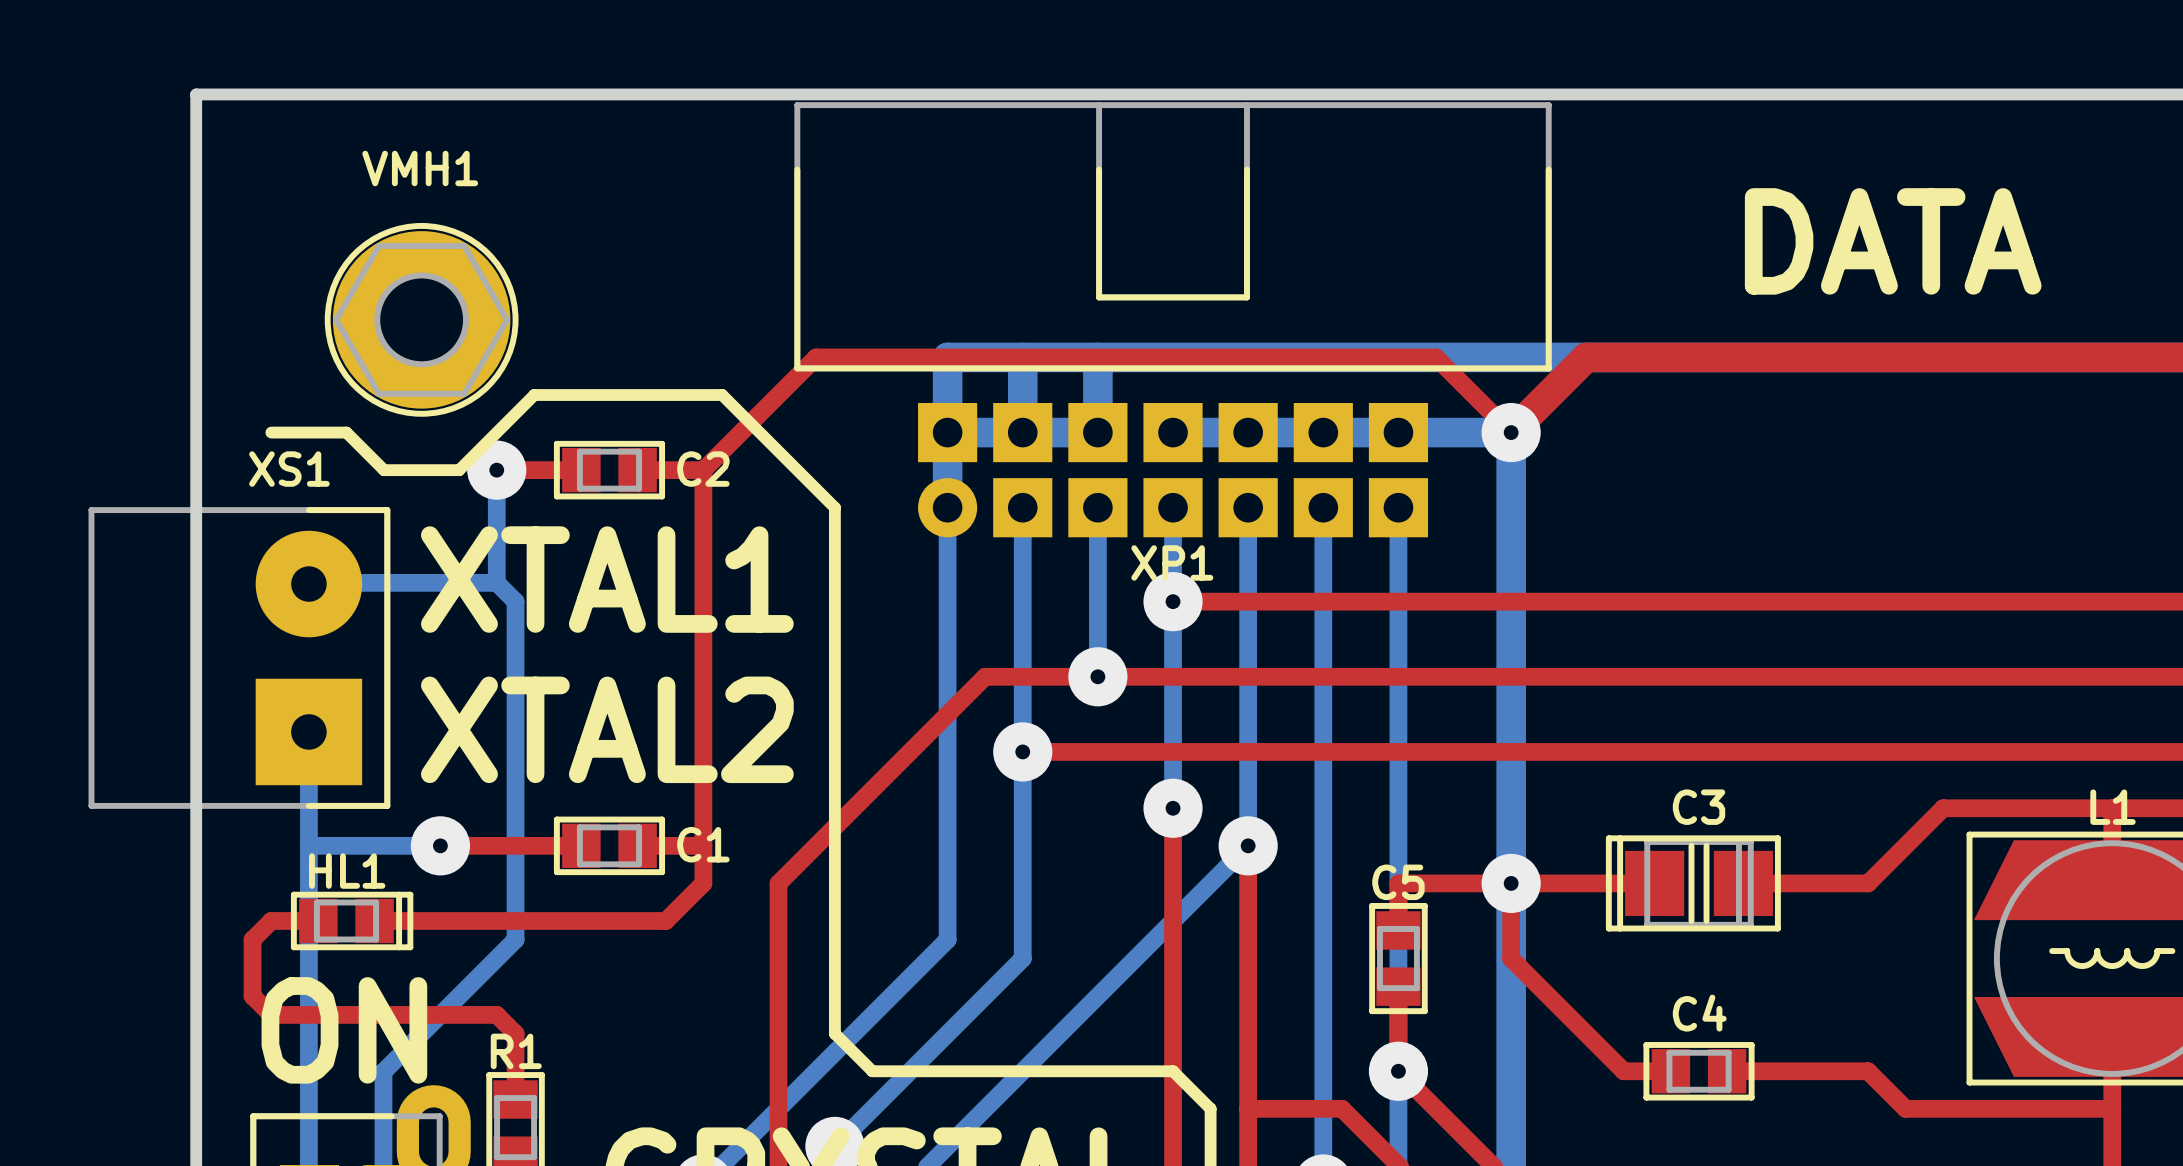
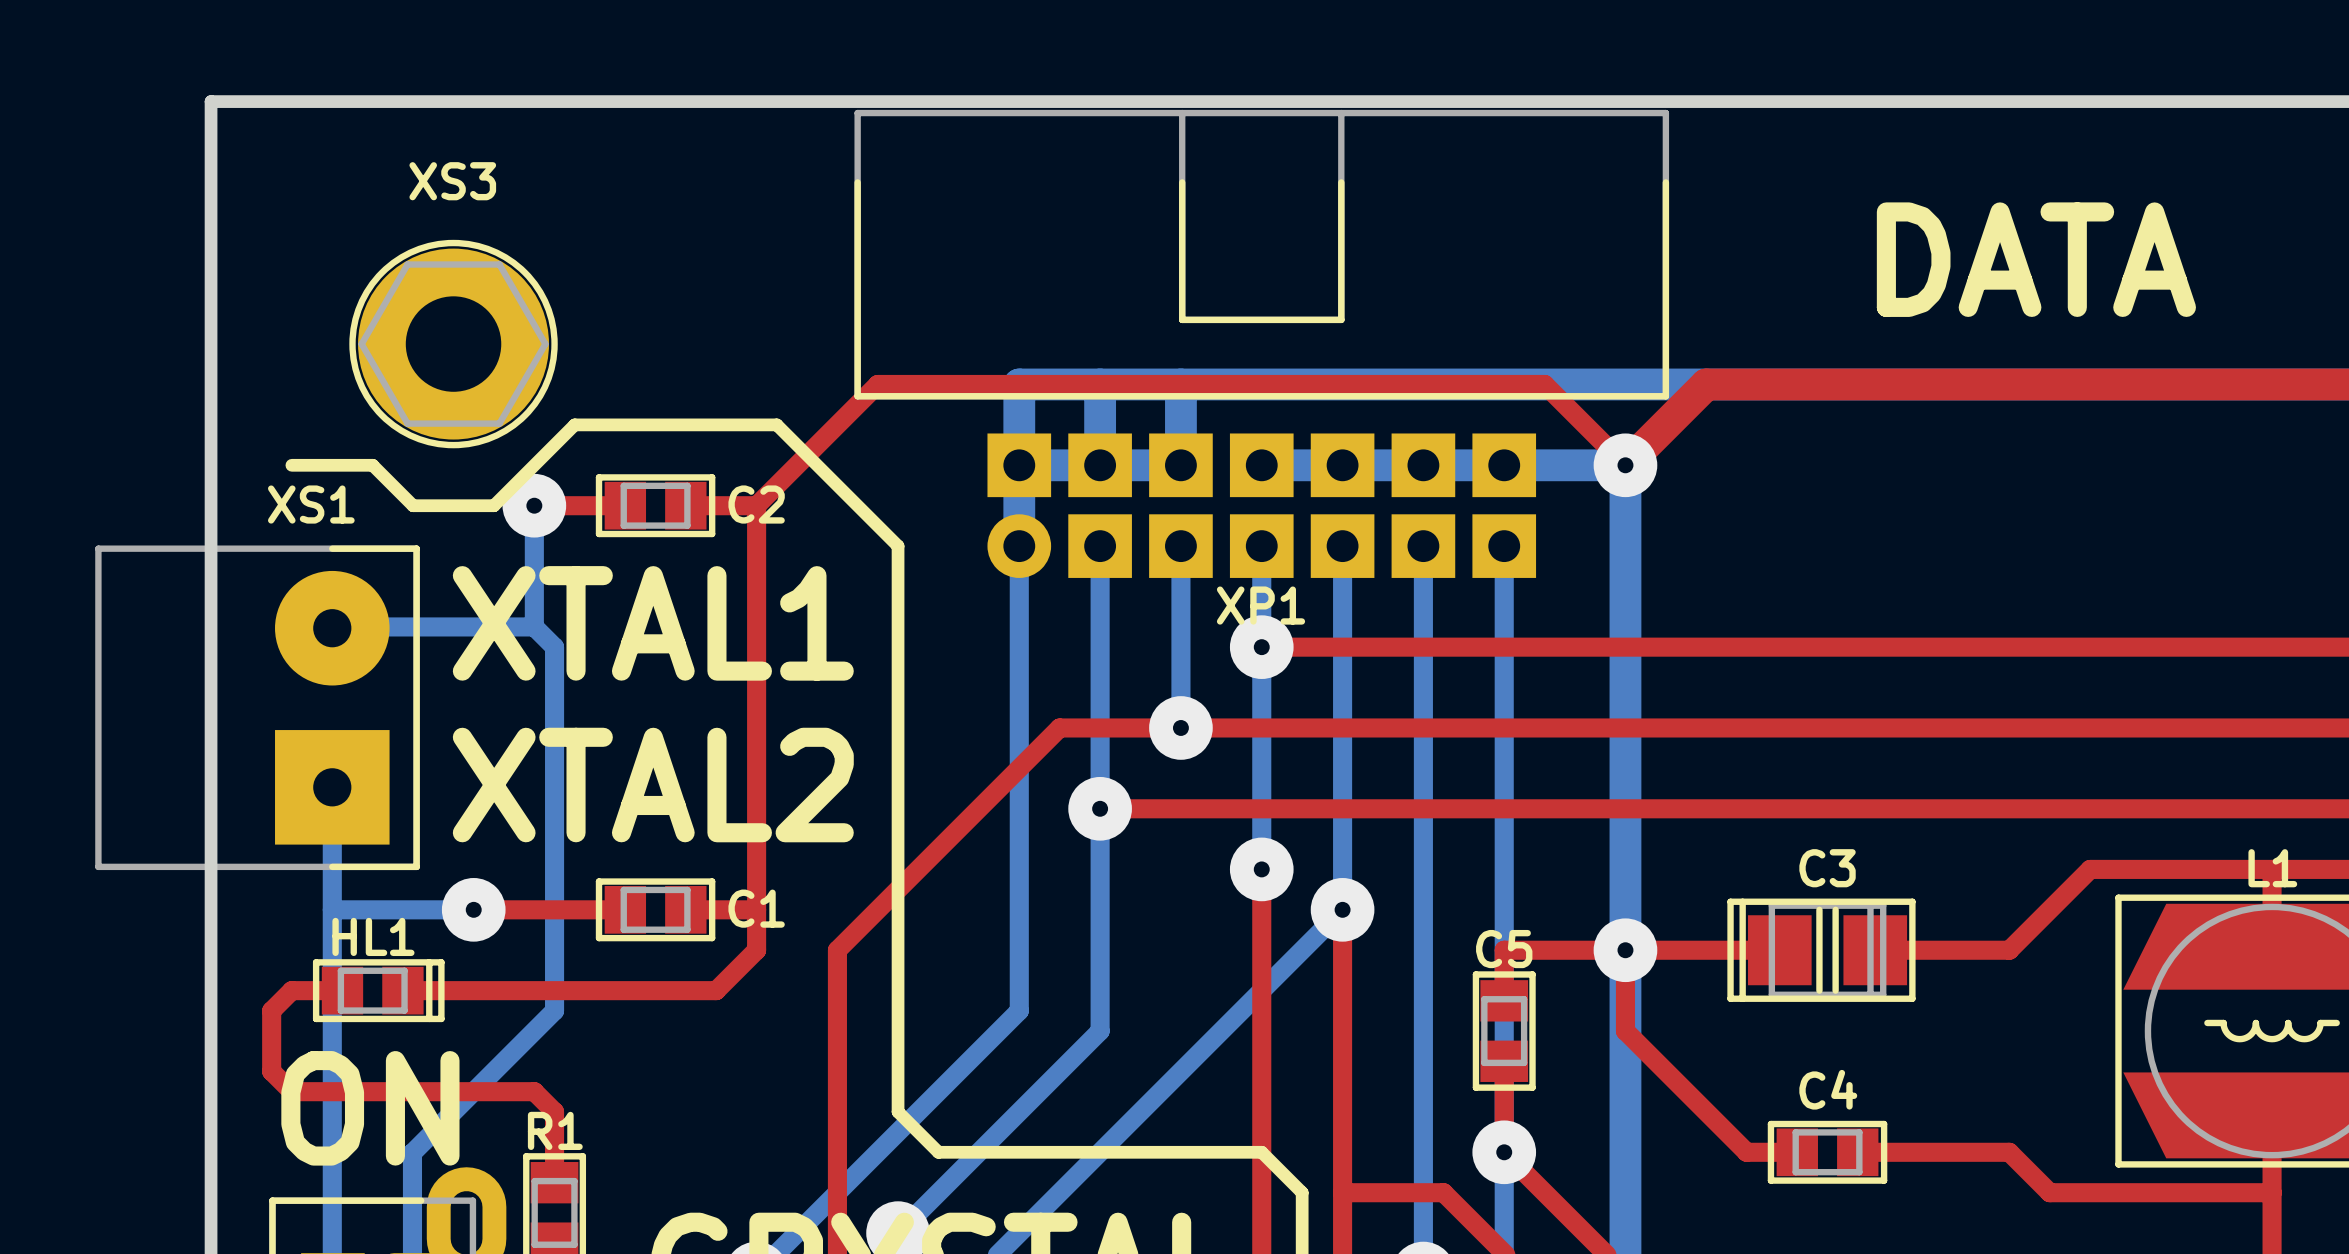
VMH1: (421, 319) -> none
XS3: none -> (453, 344)

